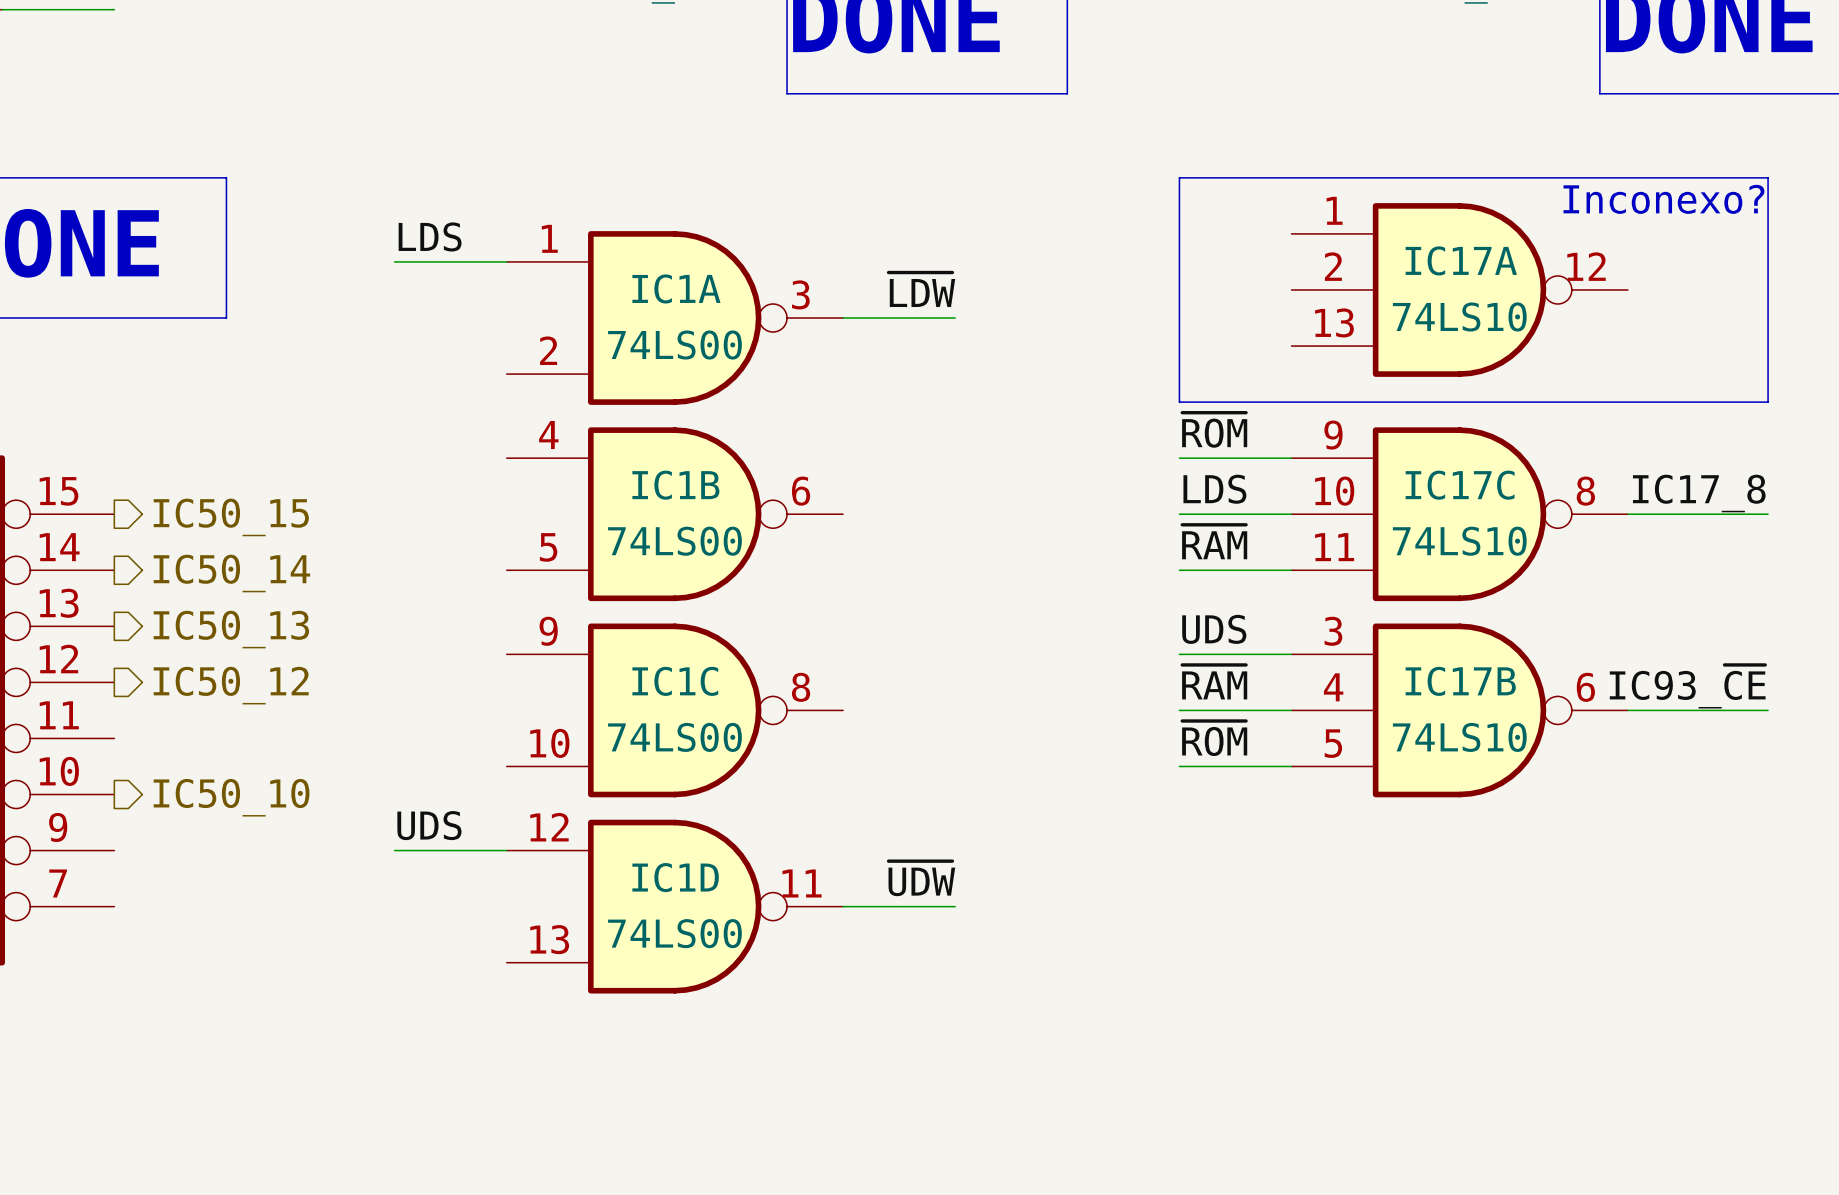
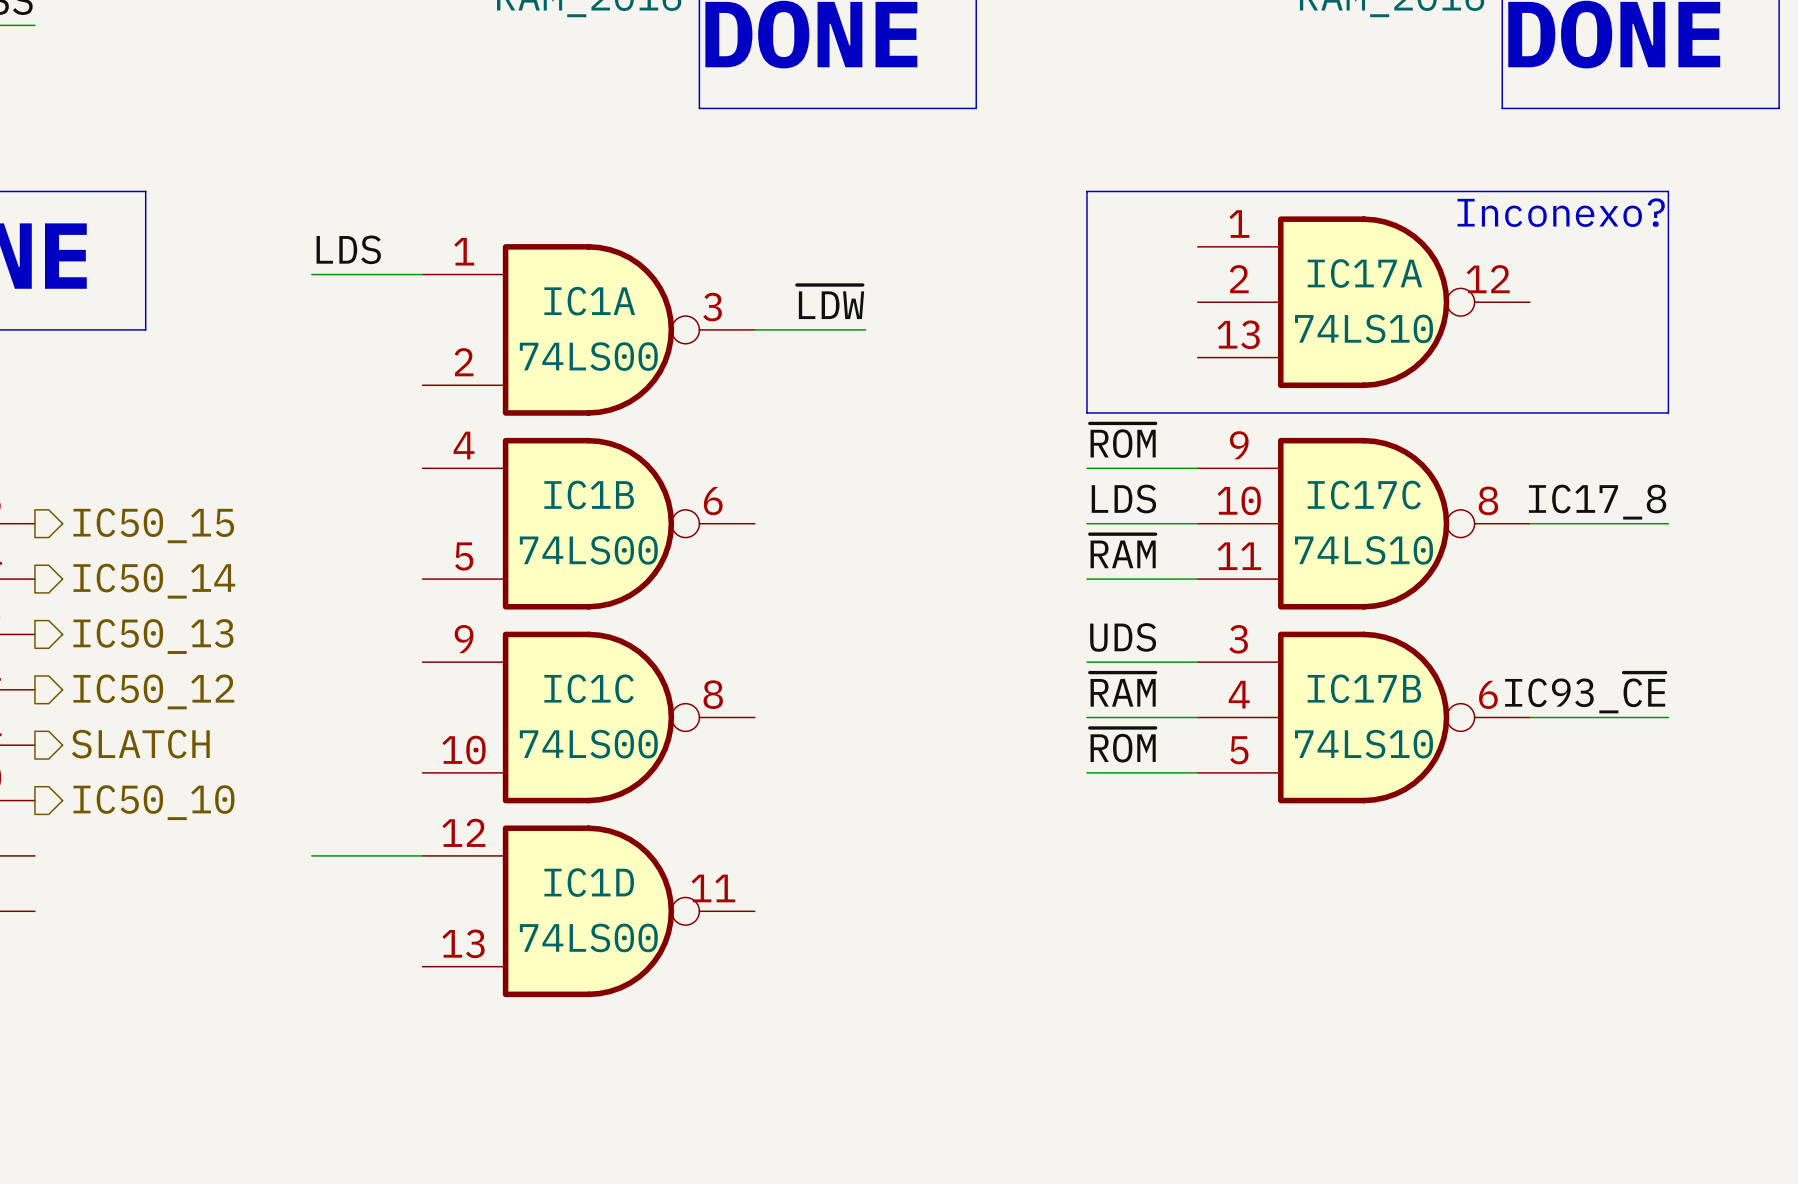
hierarchical label: none -> SLATCH (140, 744)
label: UDS (429, 825) -> none
label: ~{UDW} (921, 878) -> none
wire: (843, 906) (955, 906) -> none

